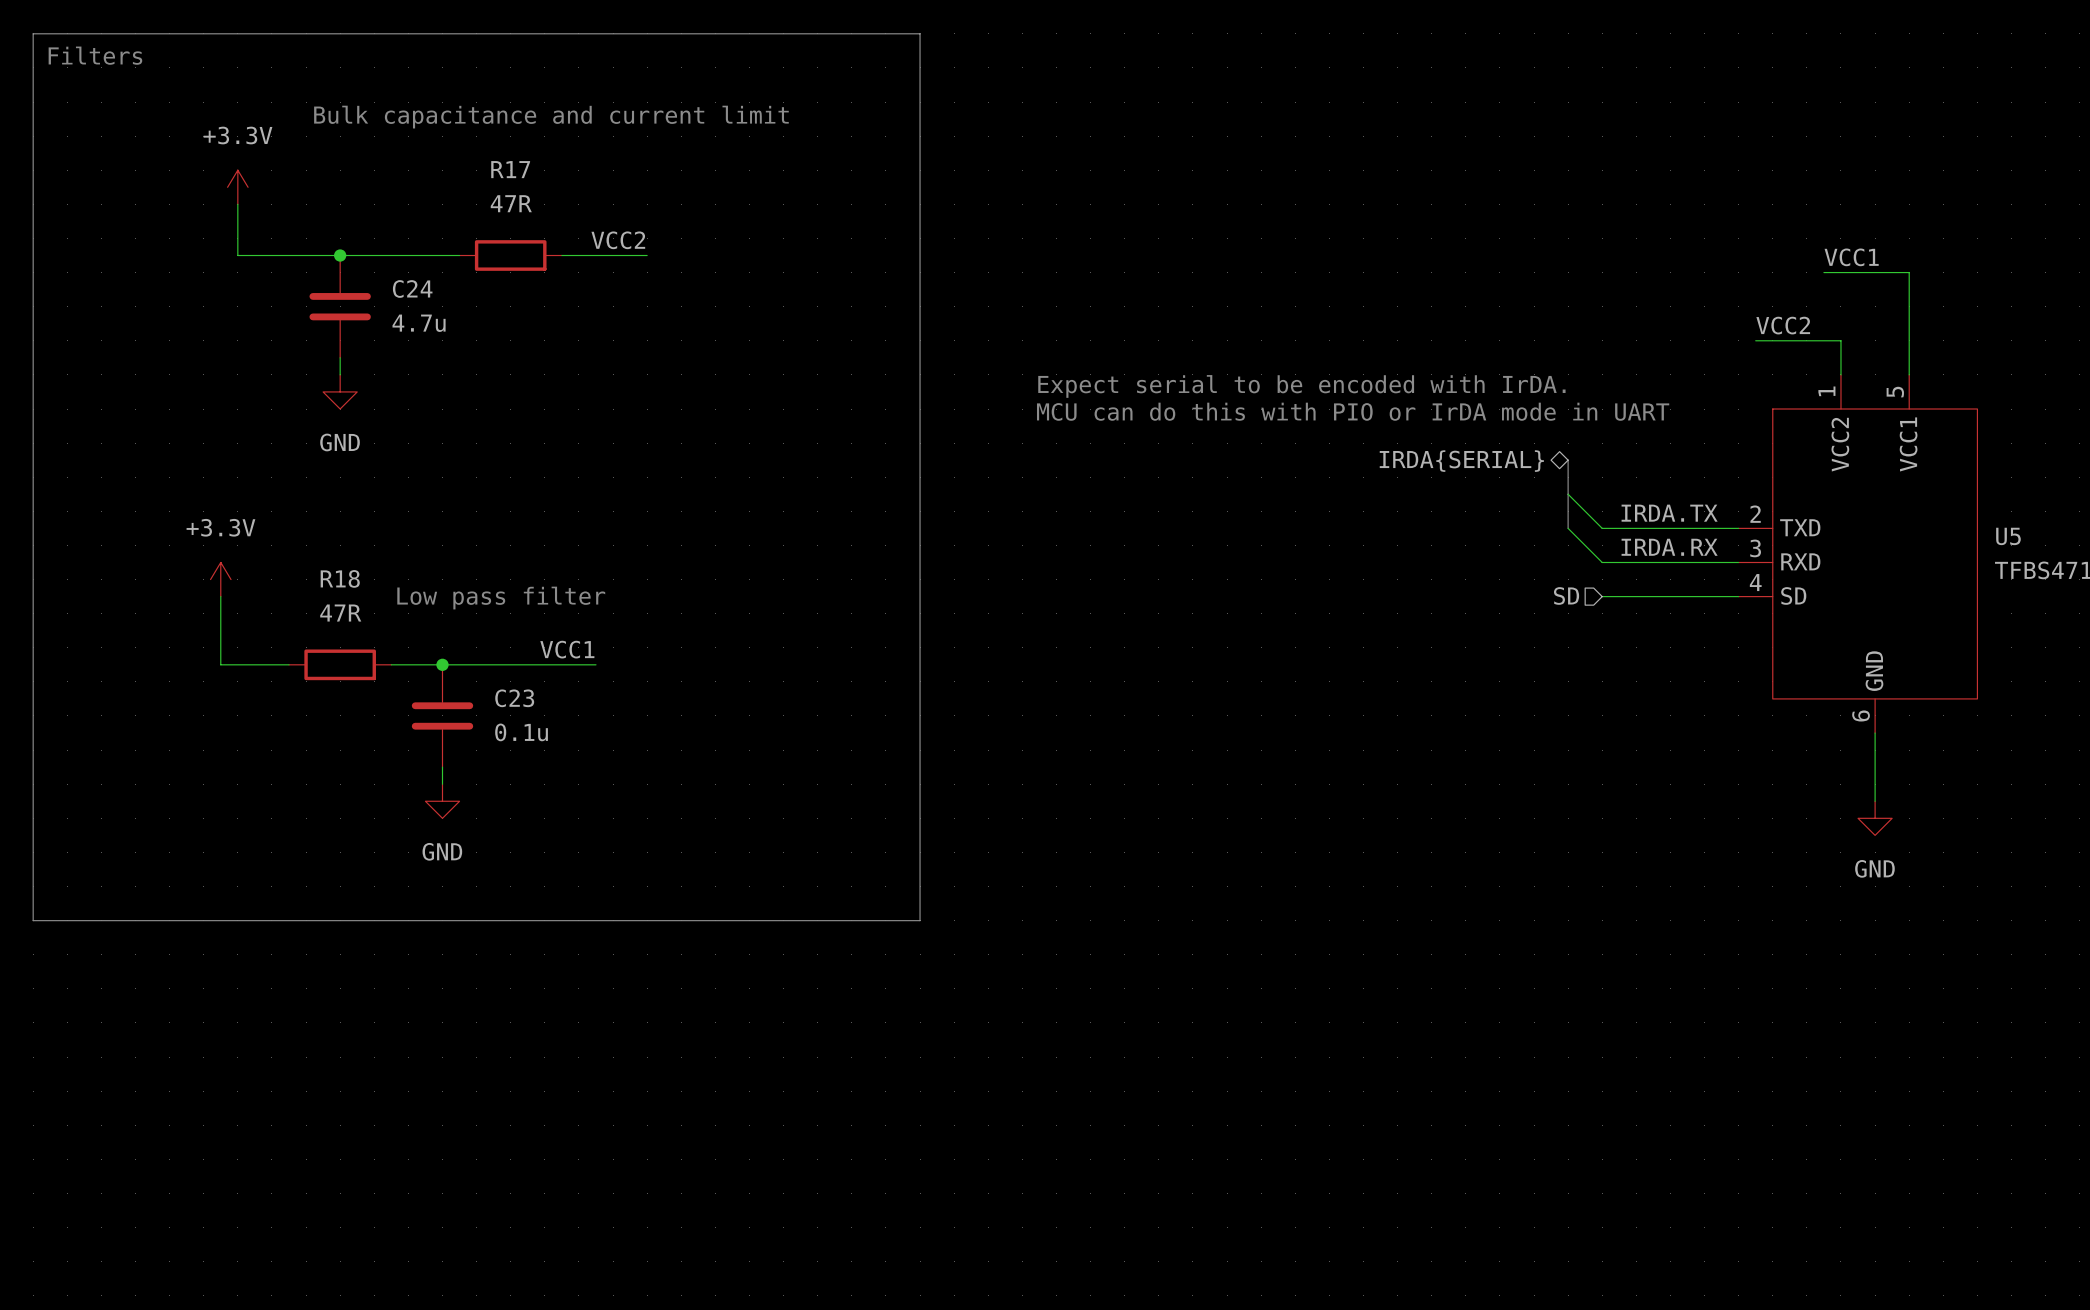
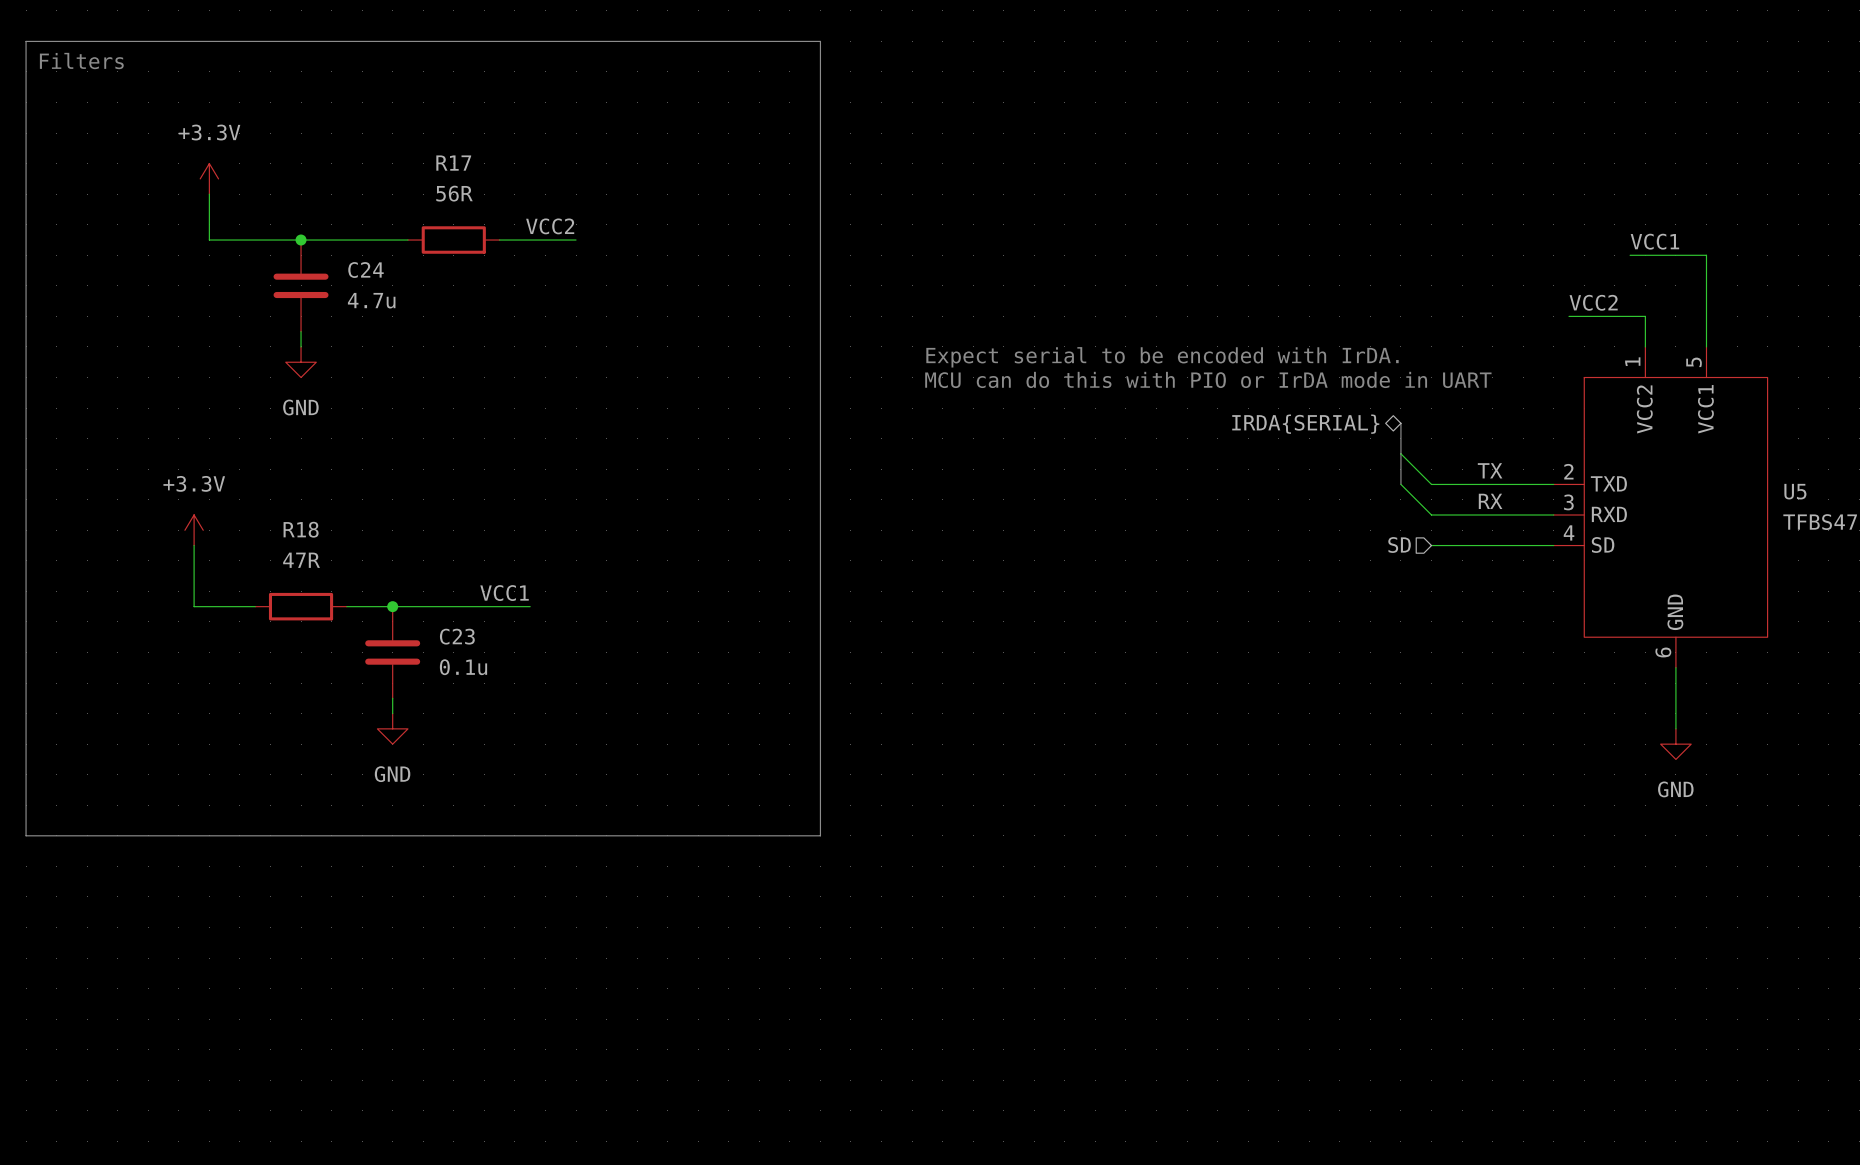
text: Bulk capacitance and current limit (551, 117) -> none
R17 value: 47R (511, 203) -> 56R (454, 193)
label: none -> TX (1490, 470)
label: IRDA.TX (1669, 513) -> none
label: none -> RX (1490, 501)
label: IRDA.RX (1669, 547) -> none
text: Low pass filter (501, 598) -> none

